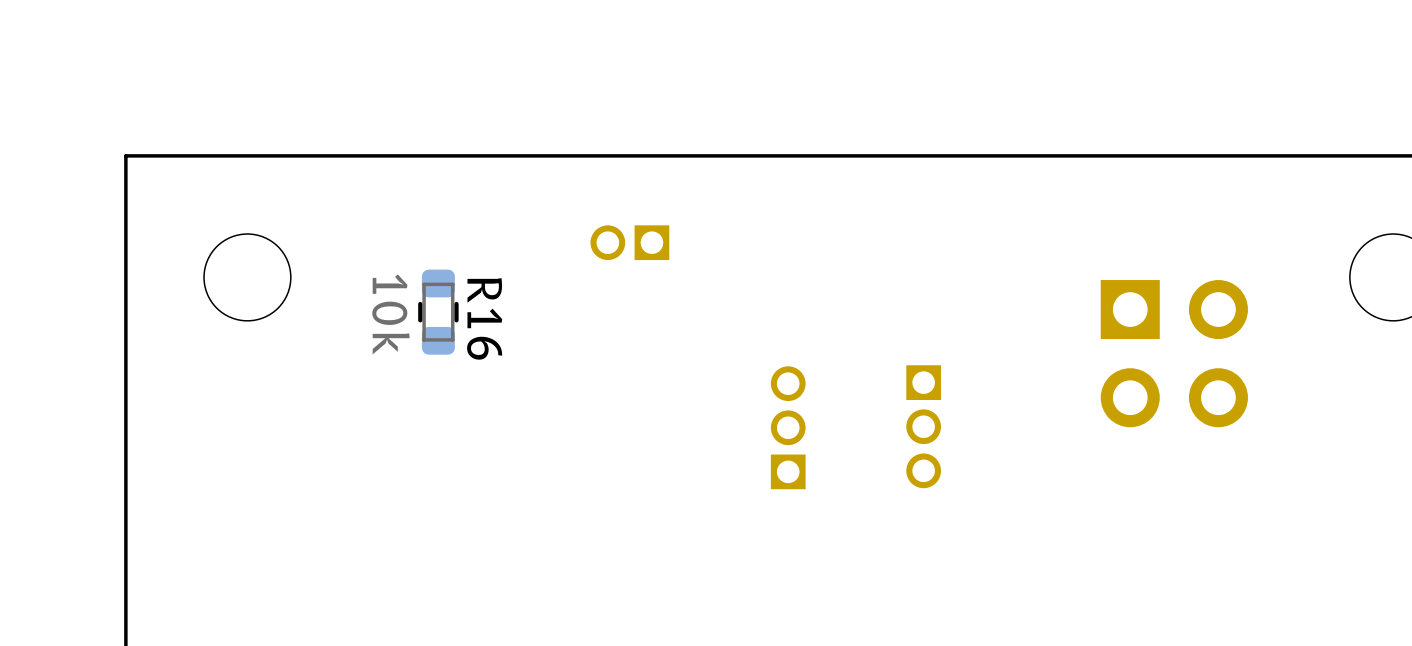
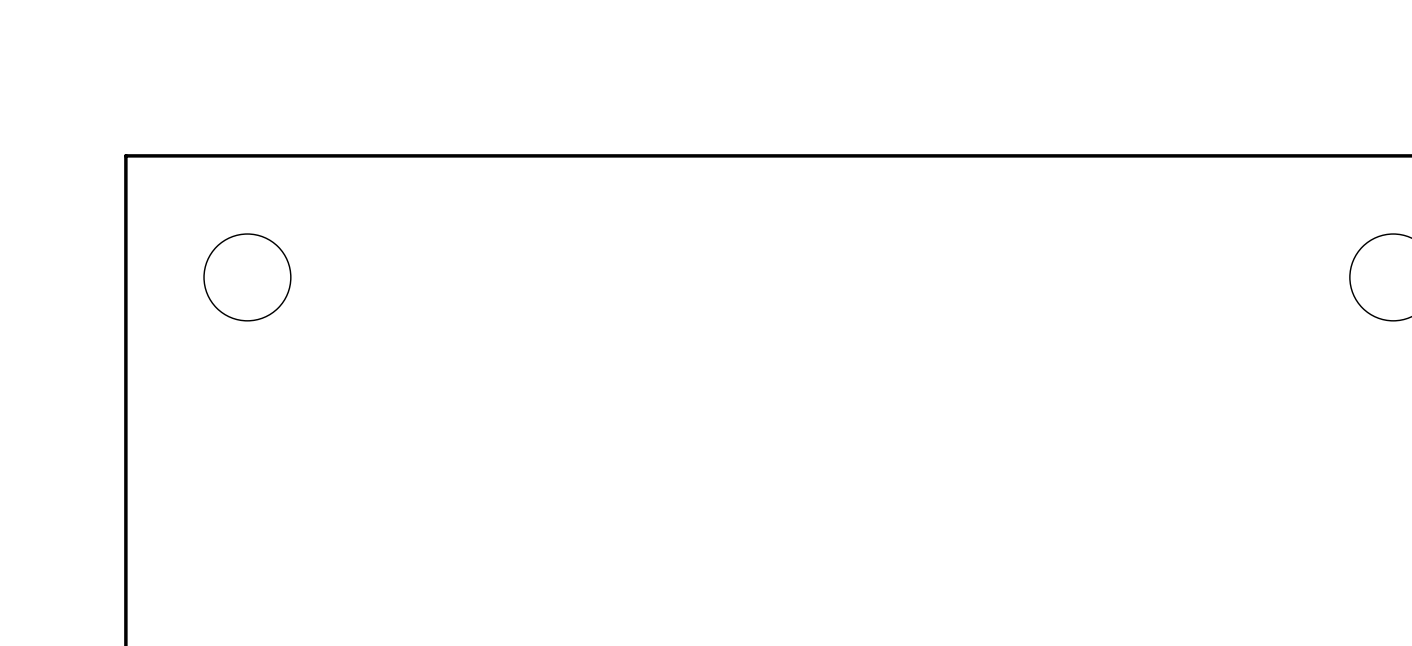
part: (629, 242) -> none
R16: 10k (438, 312) -> none
part: (1174, 353) -> none
part: (923, 426) -> none
part: (788, 427) -> none

